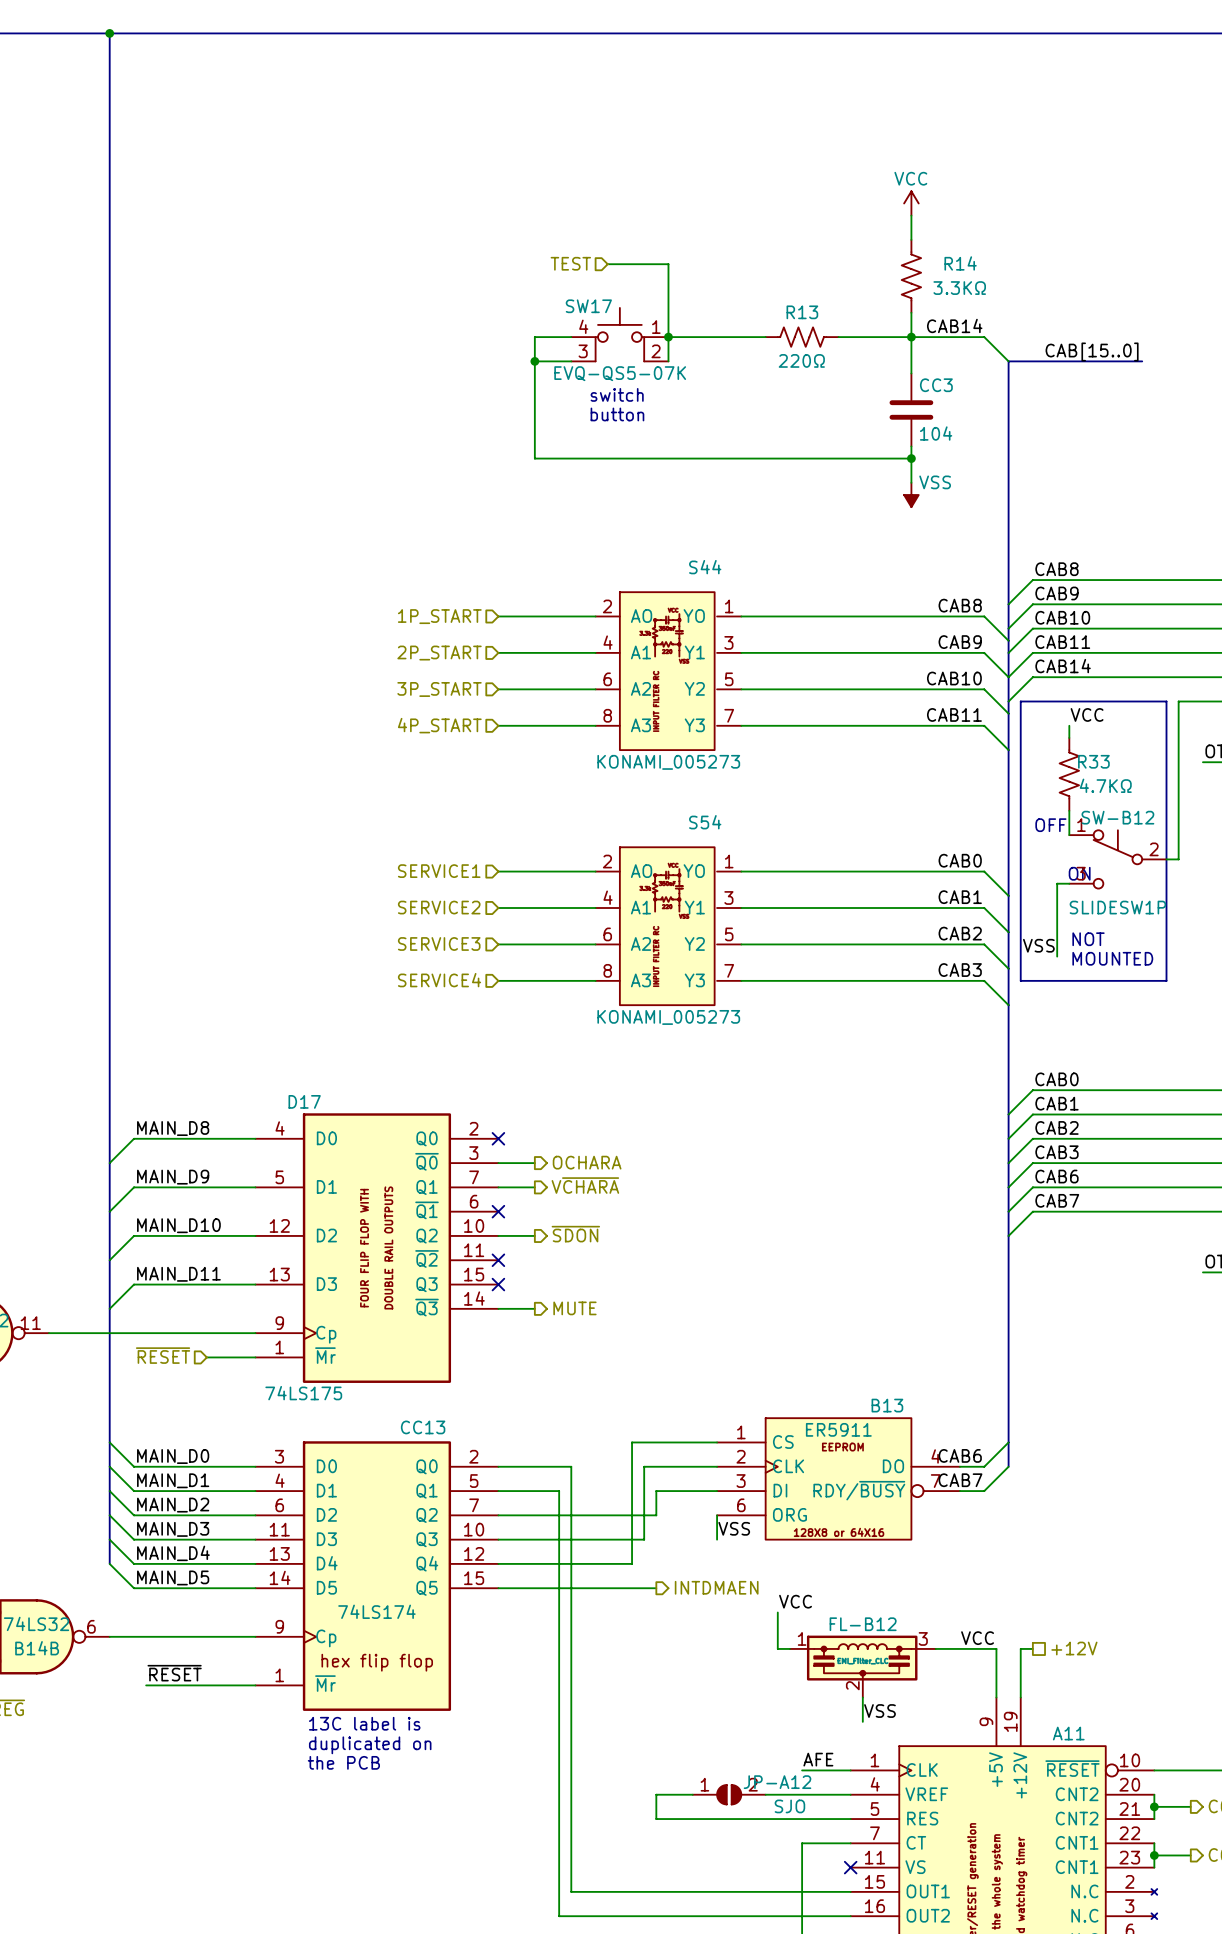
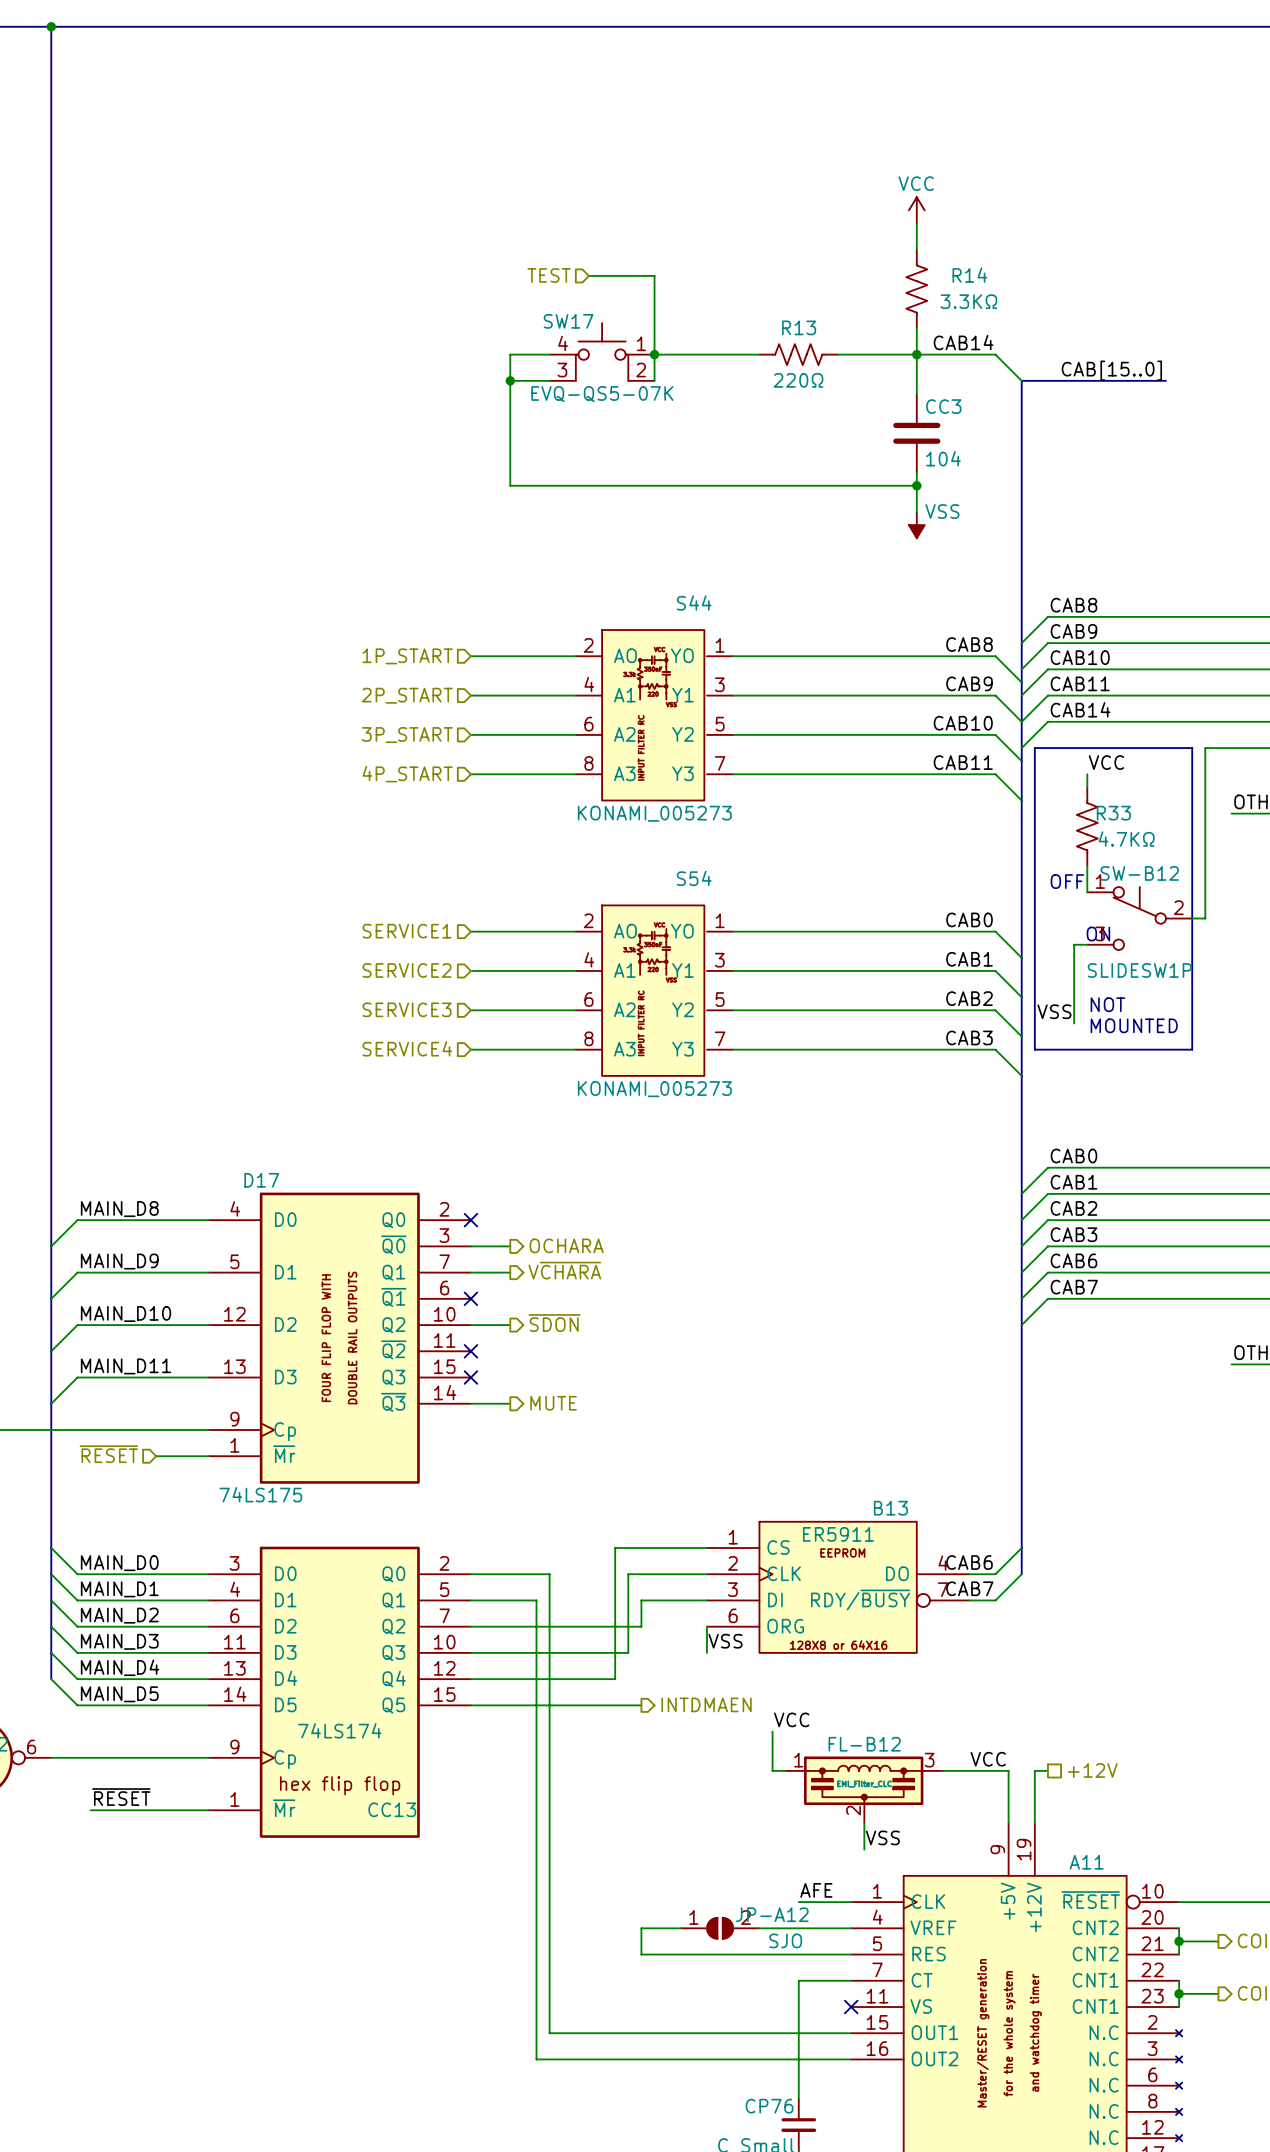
text: switch (617, 394) -> none
text: button (617, 414) -> none
CC13 name position: CC13 (423, 1427) -> CC13 (392, 1809)
text: 13C label is (364, 1723) -> none
text: duplicated on (370, 1745) -> none
text: the PCB (343, 1762) -> none

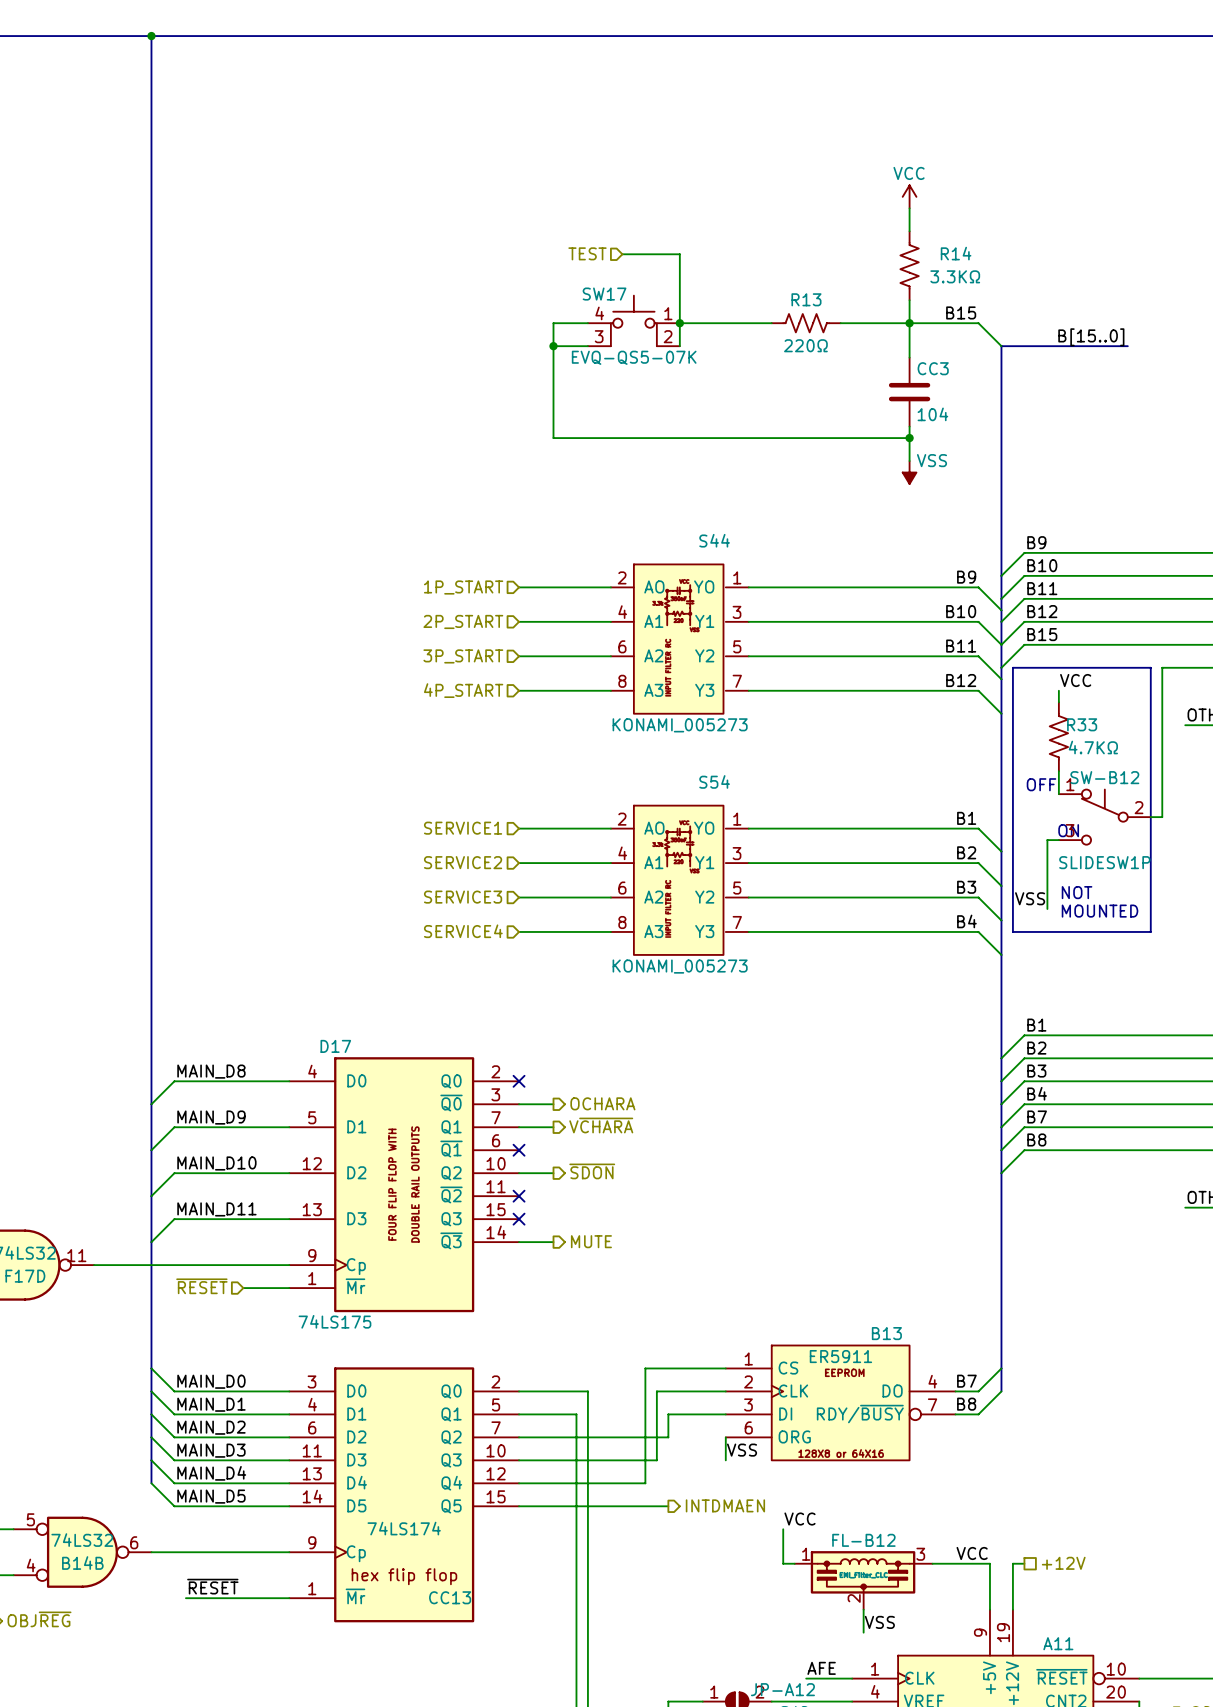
label: CAB14 (963, 342) -> B15 (961, 312)
label: CAB[15..0] (1111, 370) -> B[15..0] (1091, 337)
label: CAB8 (1073, 605) -> B9 (1036, 542)
label: CAB9 (1073, 631) -> B10 (1042, 565)
label: CAB8 (969, 644) -> B9 (966, 577)
label: CAB10 (1080, 657) -> B11 (1042, 588)
label: CAB9 (969, 683) -> B10 (961, 611)
label: CAB11 (1080, 683) -> B12 (1042, 611)
label: CAB14 (1080, 709) -> B15 (1042, 634)
label: CAB10 (963, 723) -> B11 (961, 646)
label: CAB11 (963, 762) -> B12 (961, 680)
label: CAB0 (969, 919) -> B1 (966, 818)
label: CAB1 (969, 959) -> B2 (966, 852)
label: CAB2 (969, 998) -> B3 (966, 887)
label: CAB3 (969, 1037) -> B4 (966, 921)
label: CAB0 (1073, 1155) -> B1 (1036, 1025)
label: CAB1 (1073, 1182) -> B2 (1036, 1048)
label: CAB2 (1073, 1208) -> B3 (1036, 1071)
label: CAB3 (1073, 1234) -> B4 (1037, 1093)
label: CAB6 (1073, 1260) -> B7 (1037, 1117)
label: CAB7 (1074, 1287) -> B8 (1036, 1139)
label: CAB6 (969, 1562) -> B7 (966, 1381)
label: CAB7 (969, 1588) -> B8 (966, 1404)

